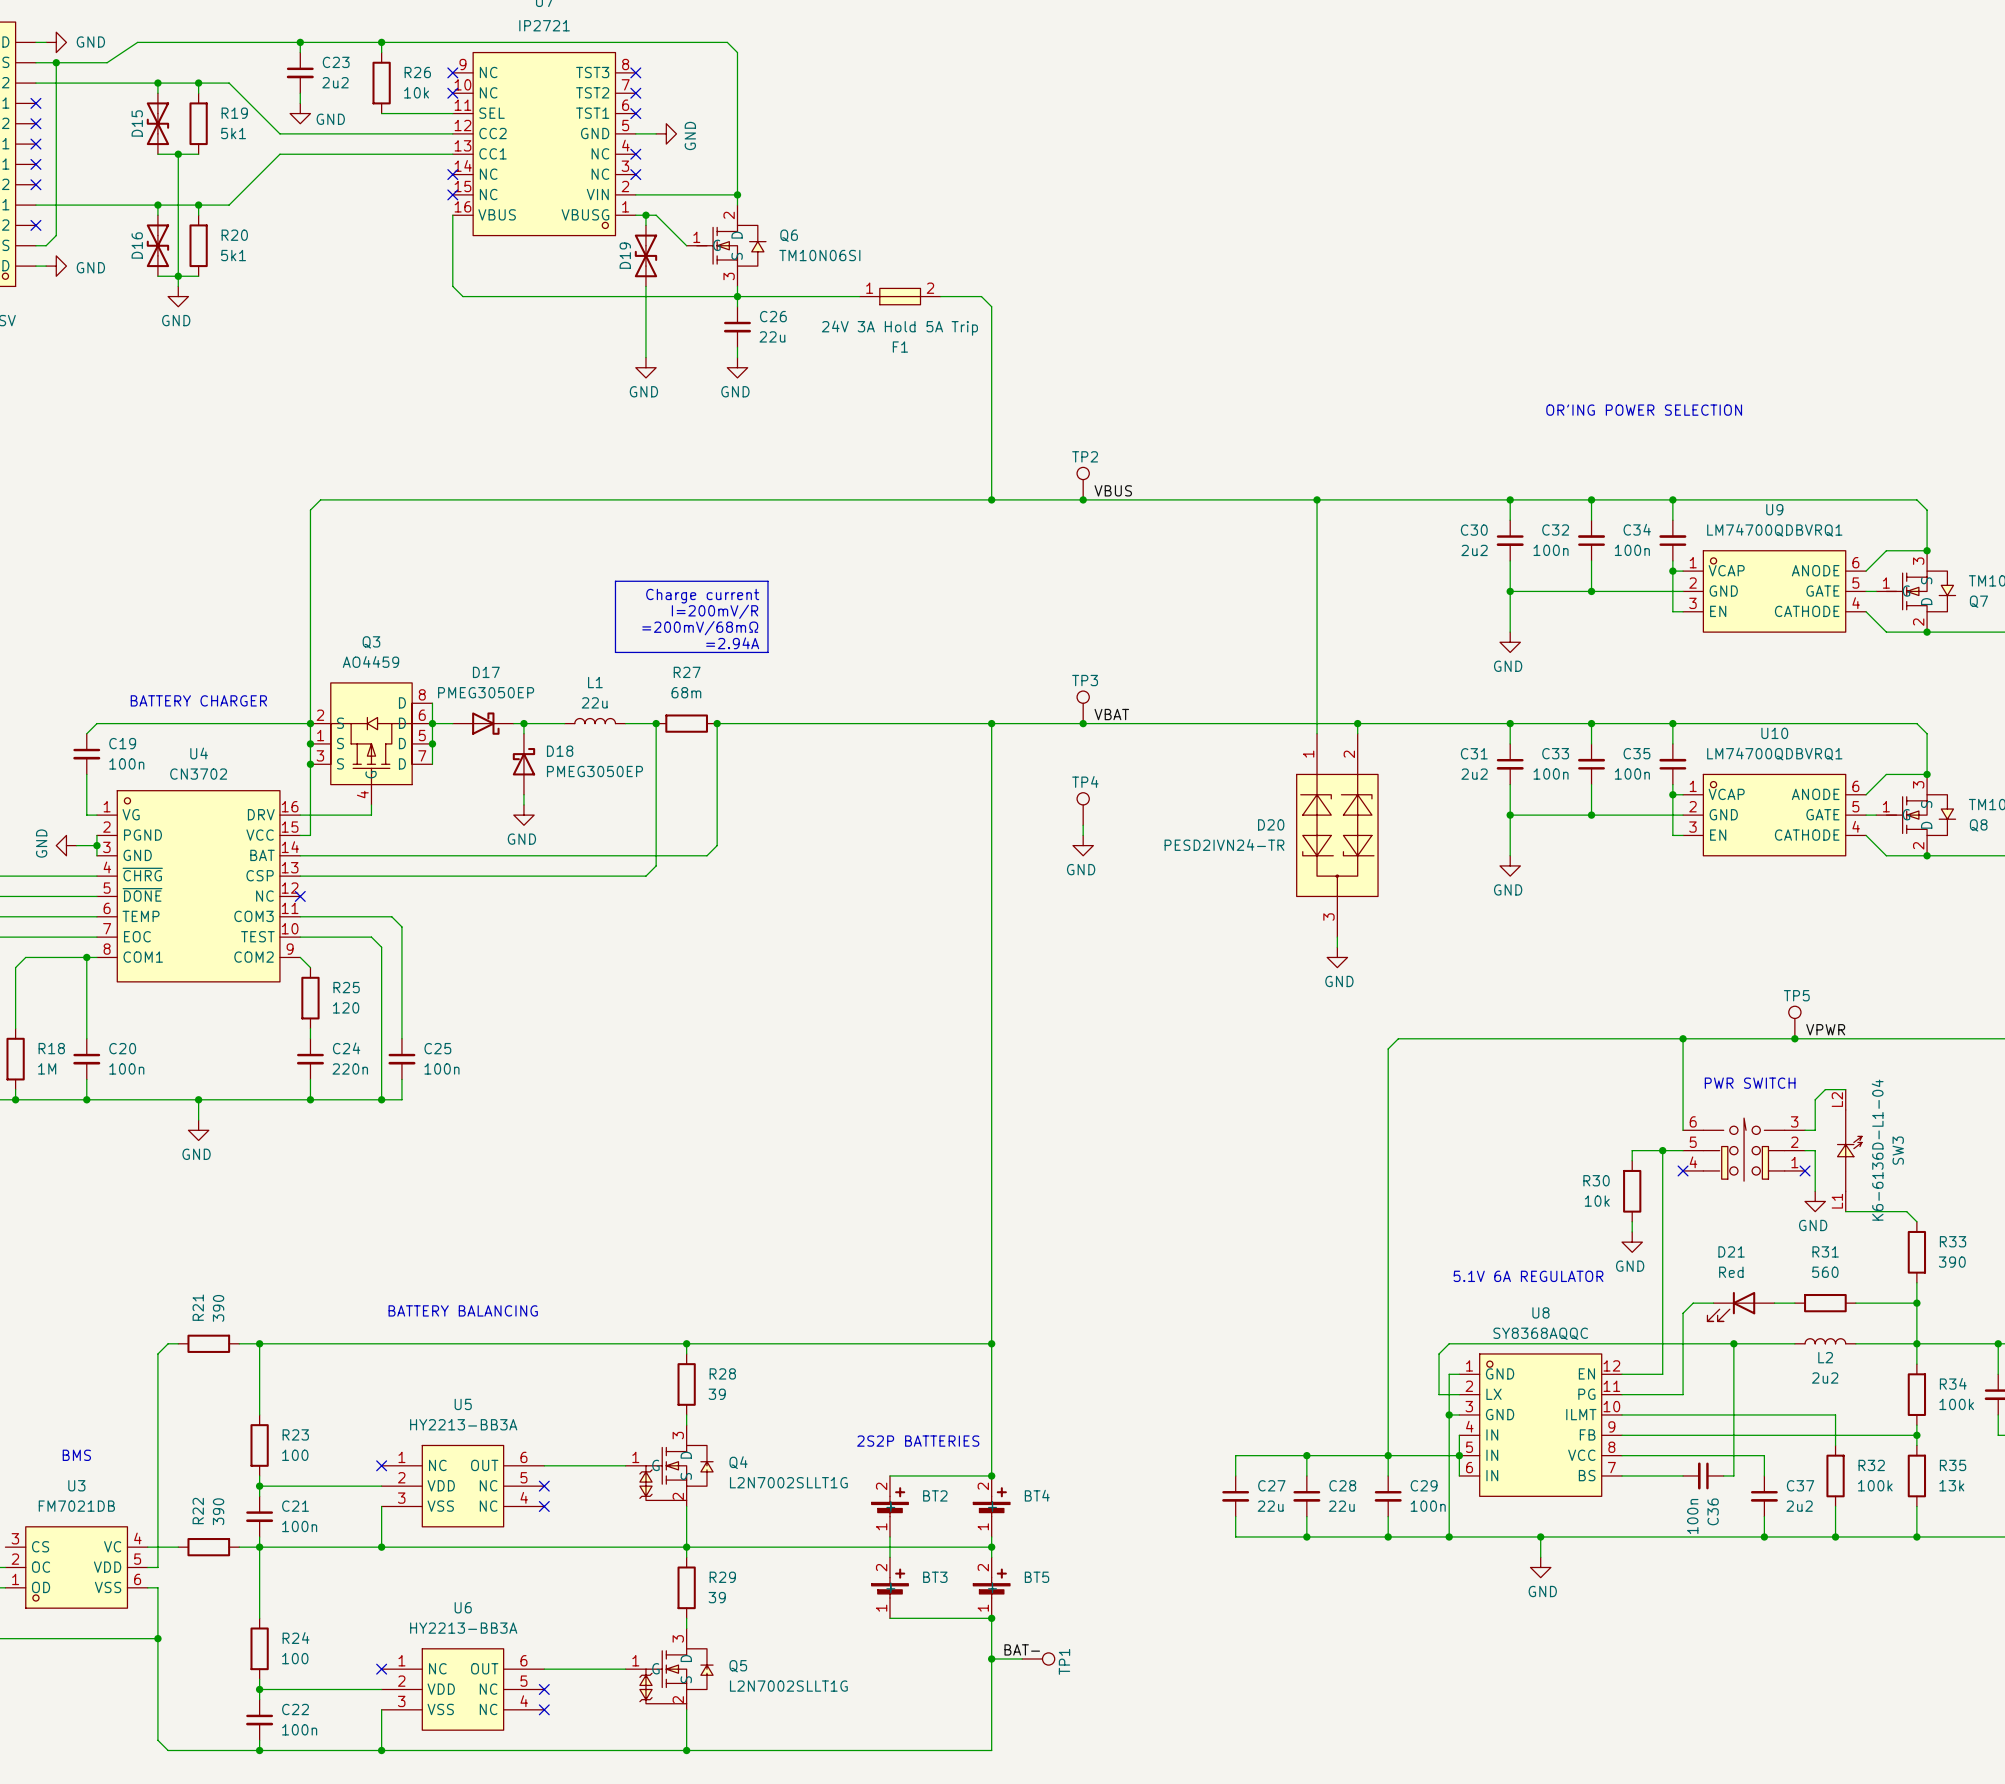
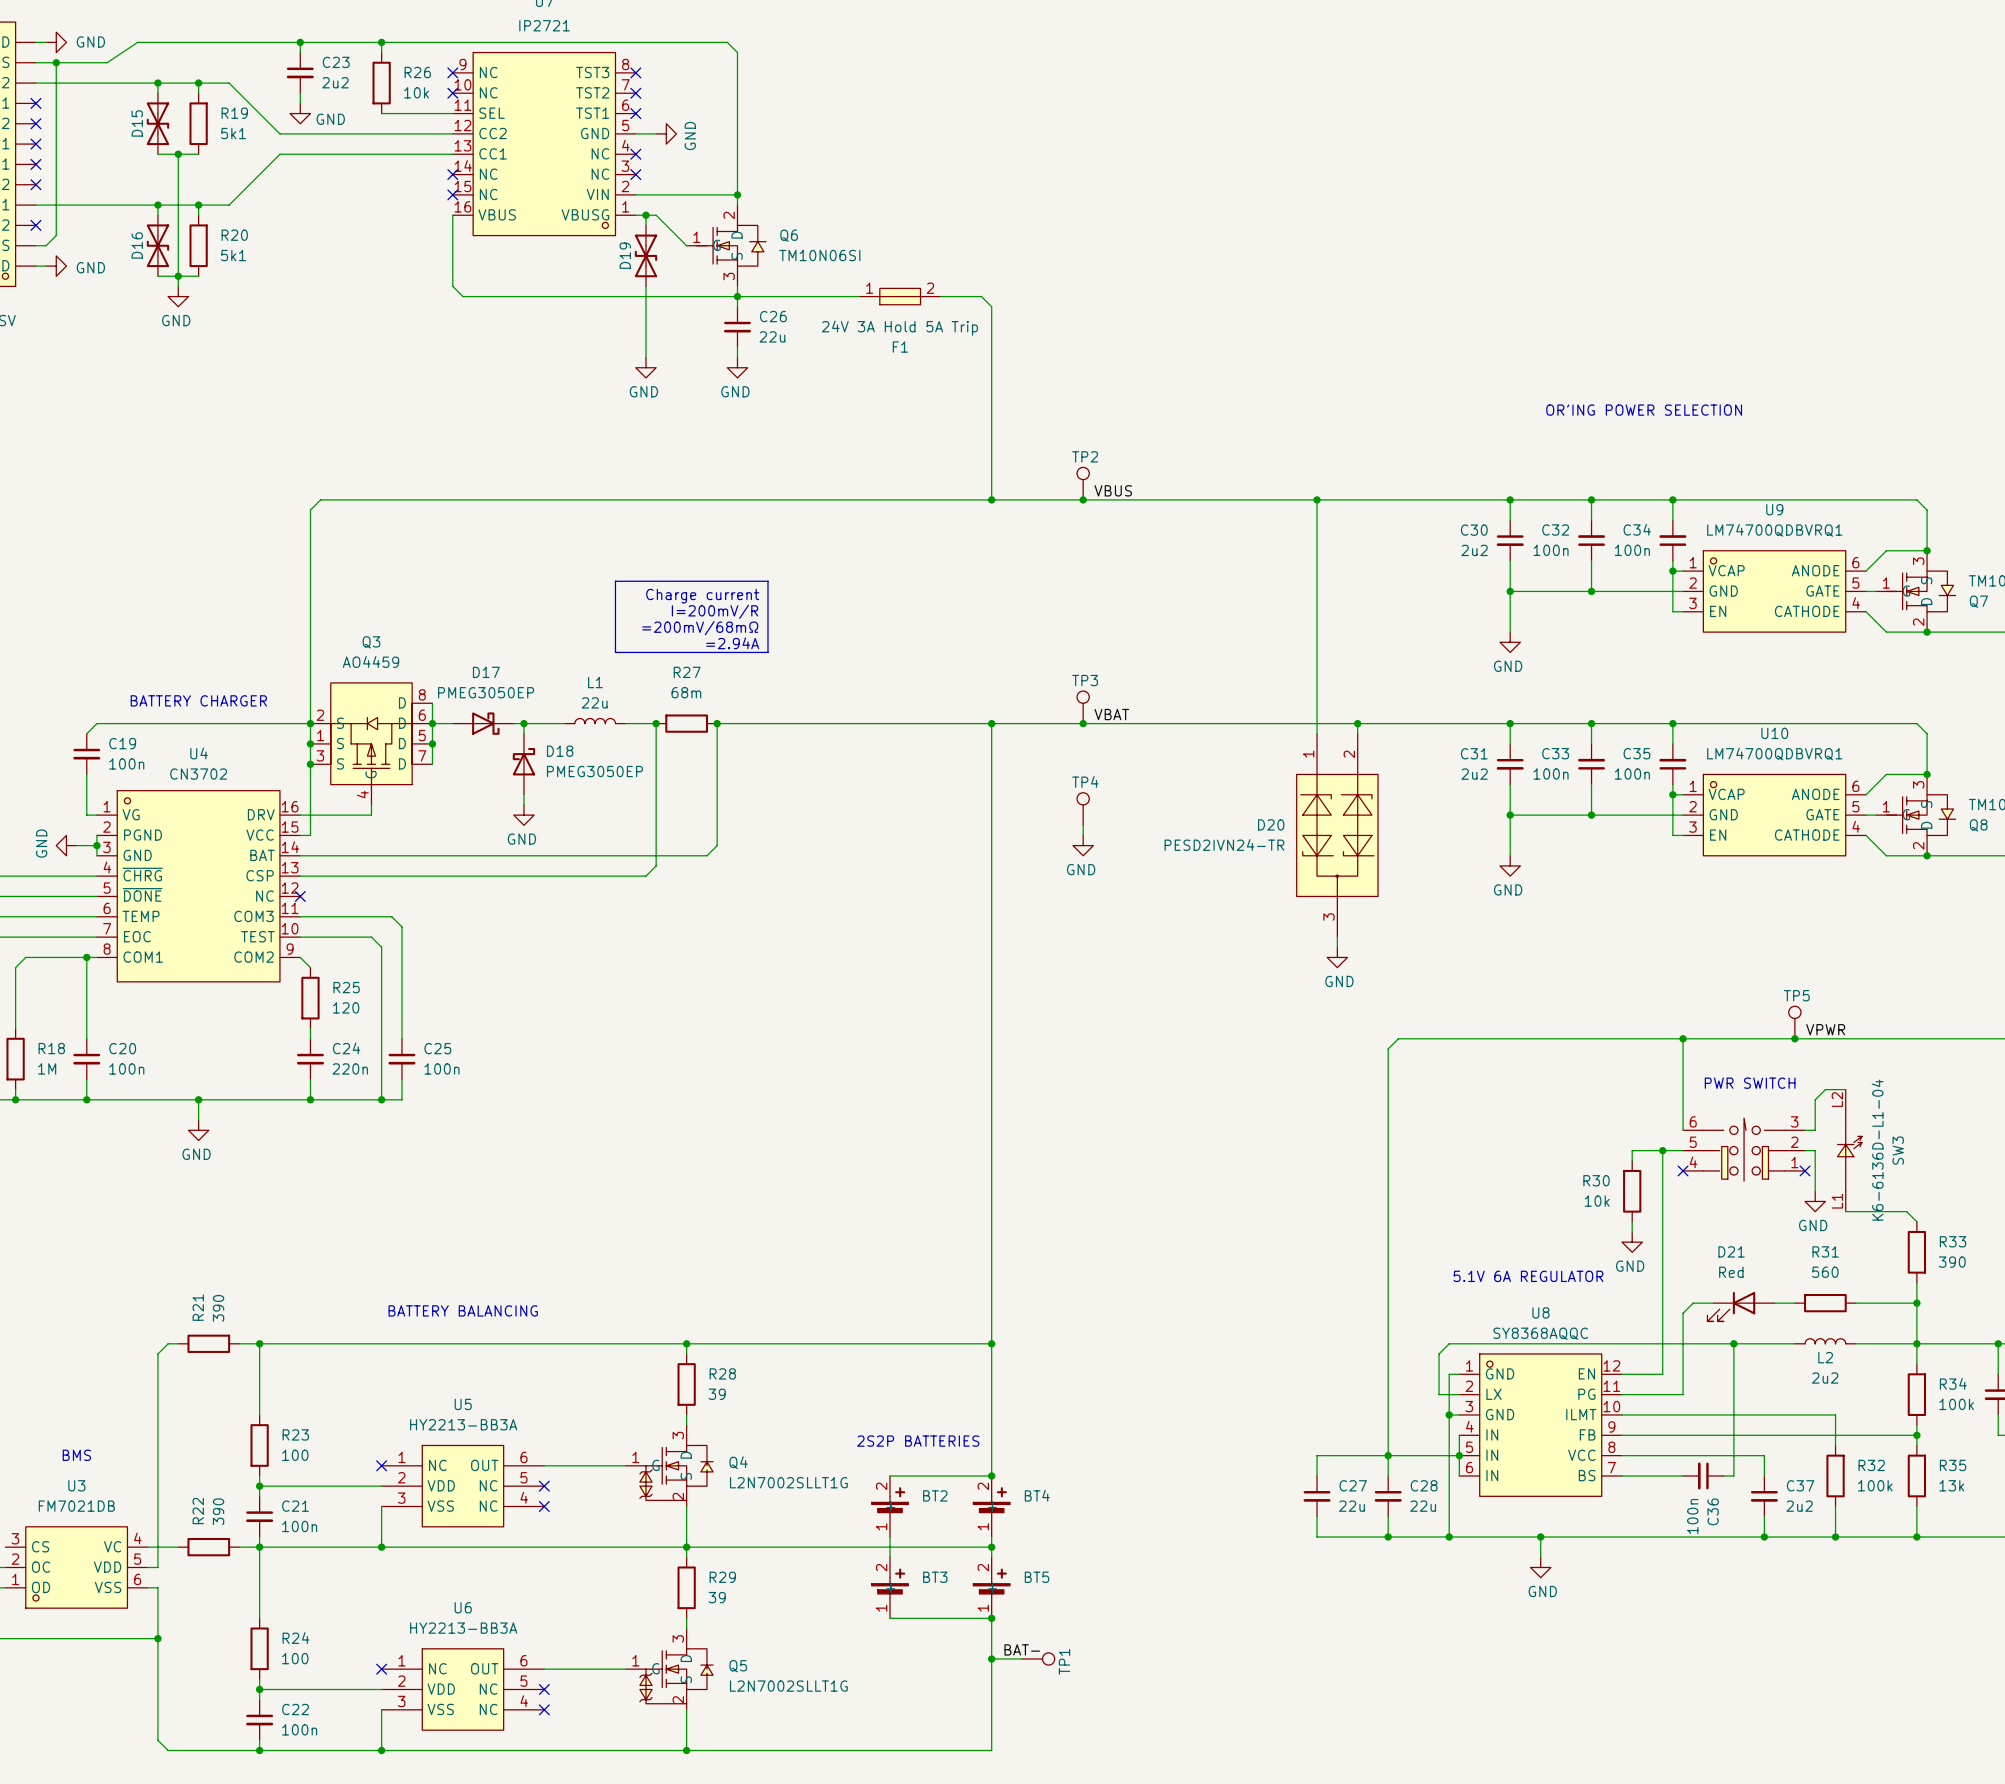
wire: (1306, 1455) (1306, 1475) -> none
junction: (1306, 1455) -> none
wire: (1317, 1455) (1235, 1455) (1235, 1475) -> (1317, 1455) (1317, 1475)
C29 name: C29 (1424, 1485) -> C28 (1424, 1485)
C27 position: (1235, 1496) -> (1317, 1496)
C28: 22u (1306, 1496) -> none
C29 value: 100n (1428, 1506) -> 22u (1423, 1506)
wire: (1235, 1516) (1235, 1536) (1317, 1536) -> (1317, 1516) (1317, 1536)
wire: (1306, 1516) (1306, 1536) -> none
junction: (1306, 1536) -> none

